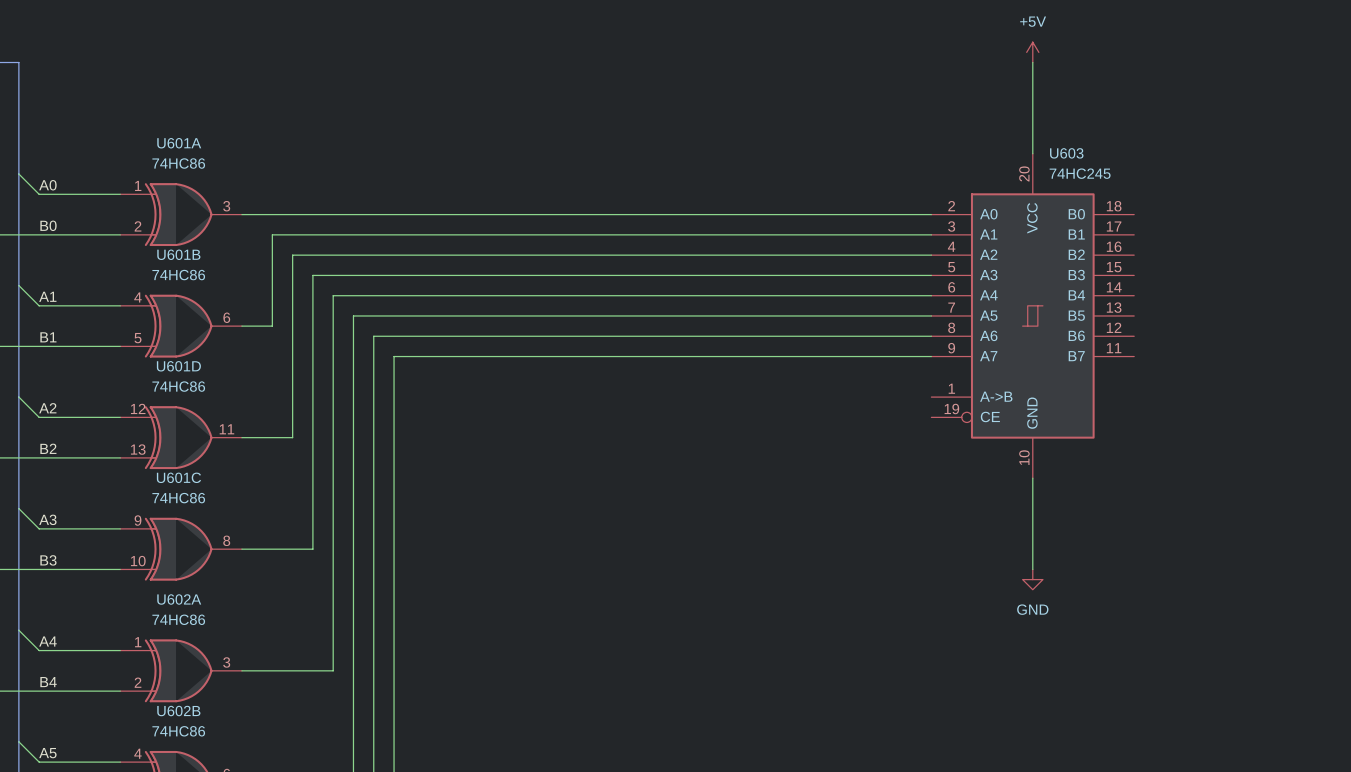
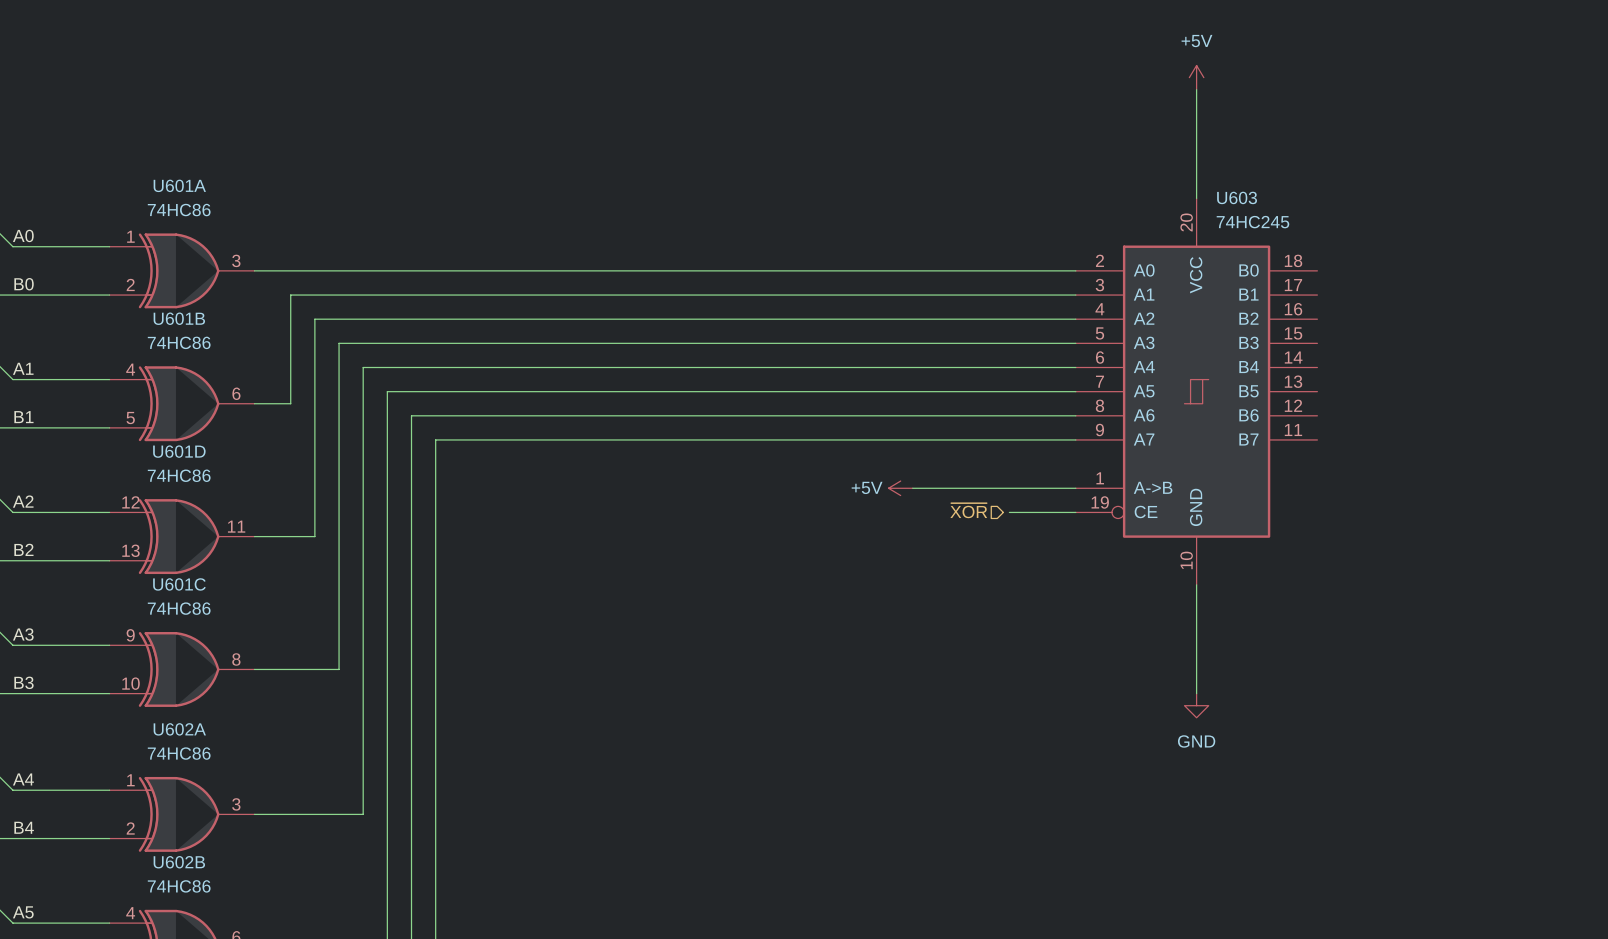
power symbol: none -> +5V (900, 488)
wire: none -> (912, 488) (1075, 488)
hierarchical label: none -> ~{XOR} (968, 510)
wire: none -> (1009, 512) (1075, 512)

